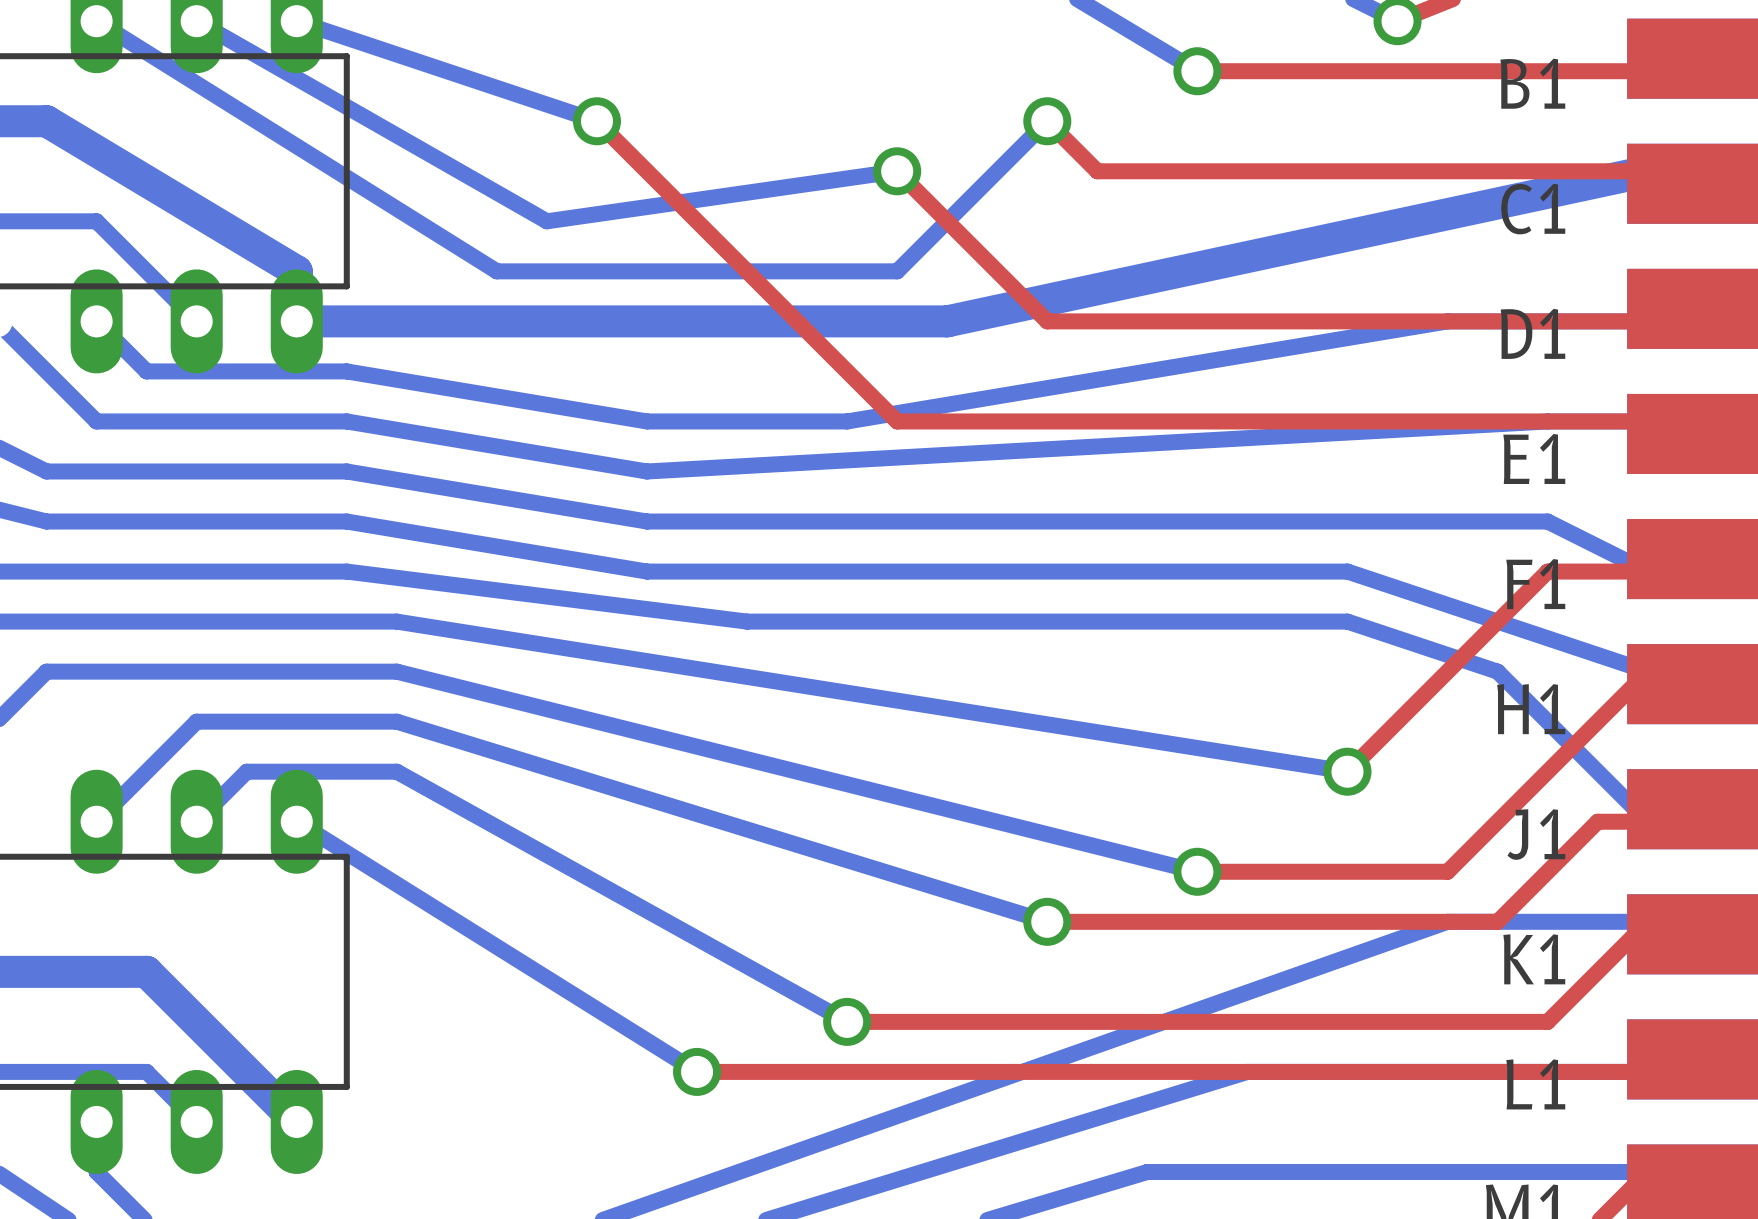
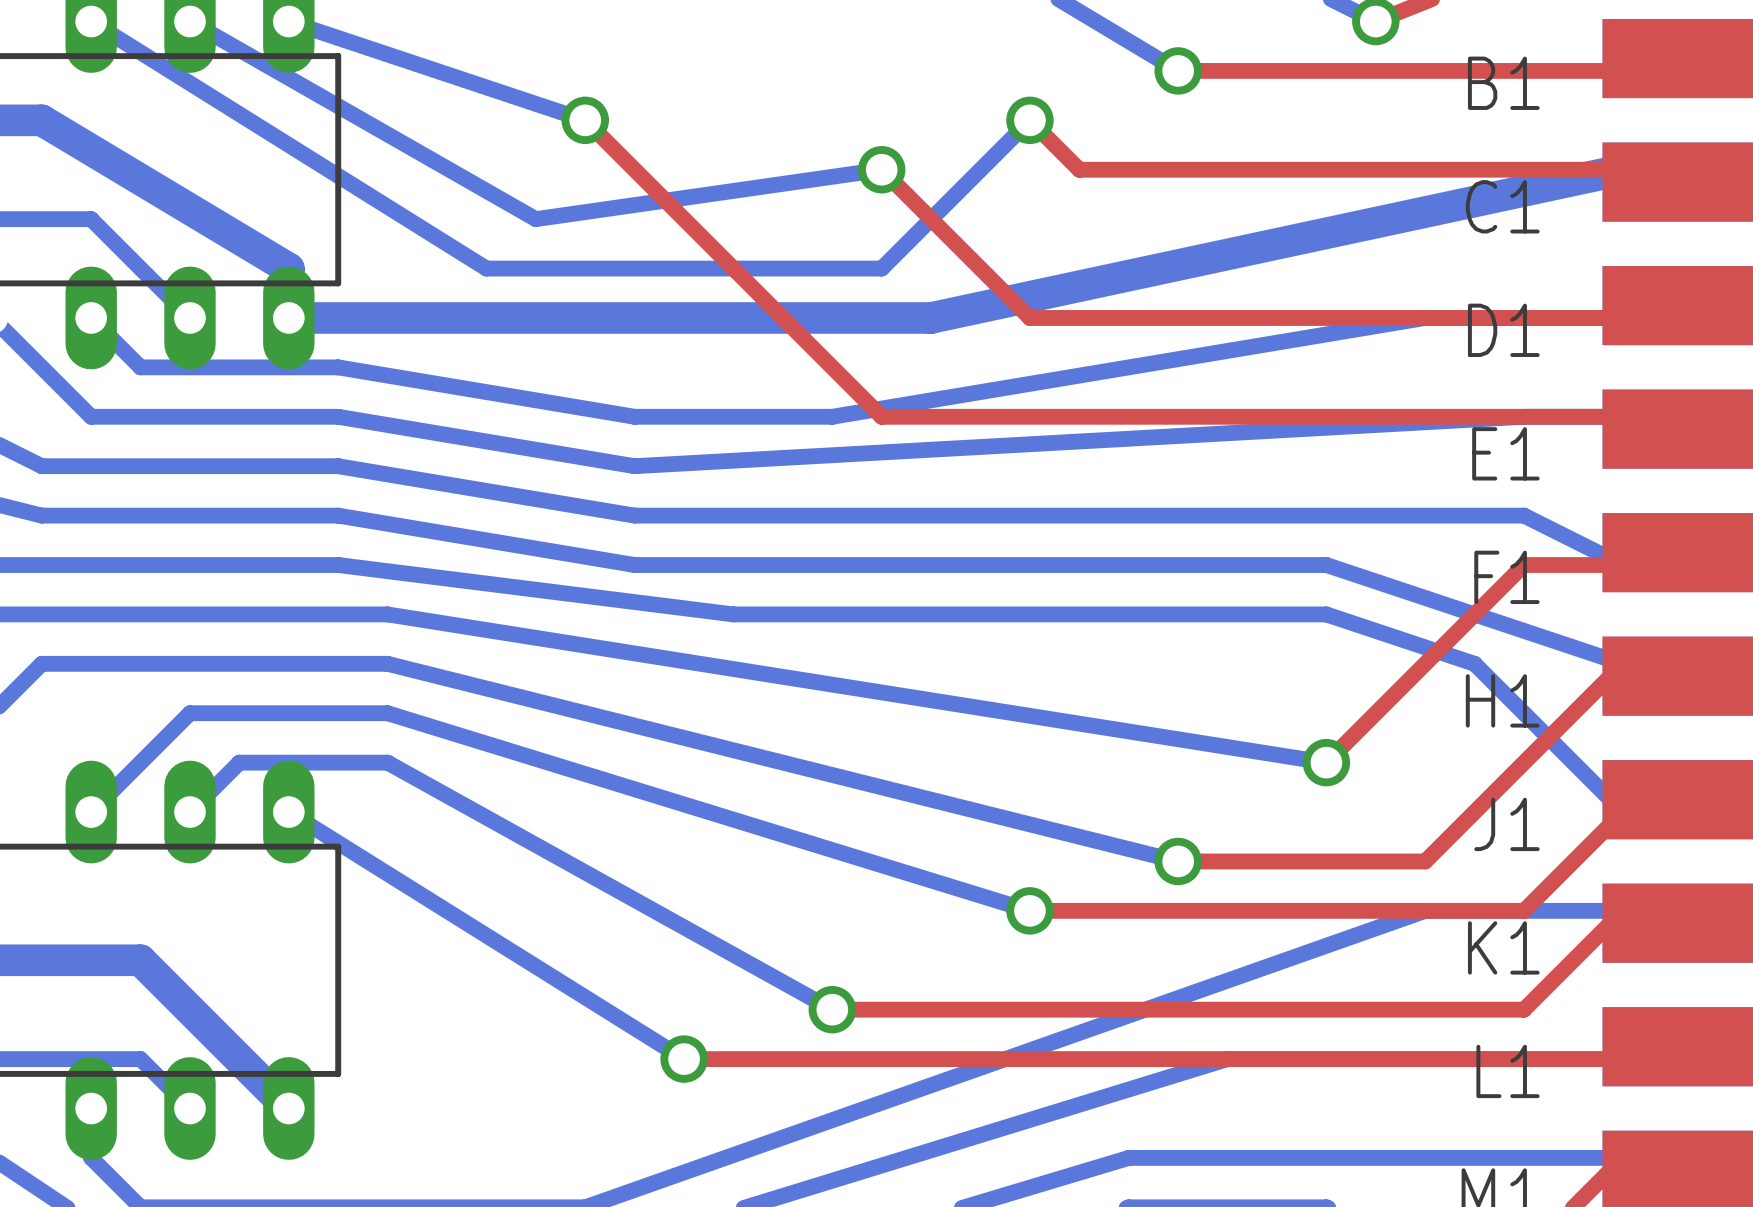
top track: (1647, 821) (1597, 821) (1497, 921) -> (1622, 812) (1524, 910) (1474, 910)

